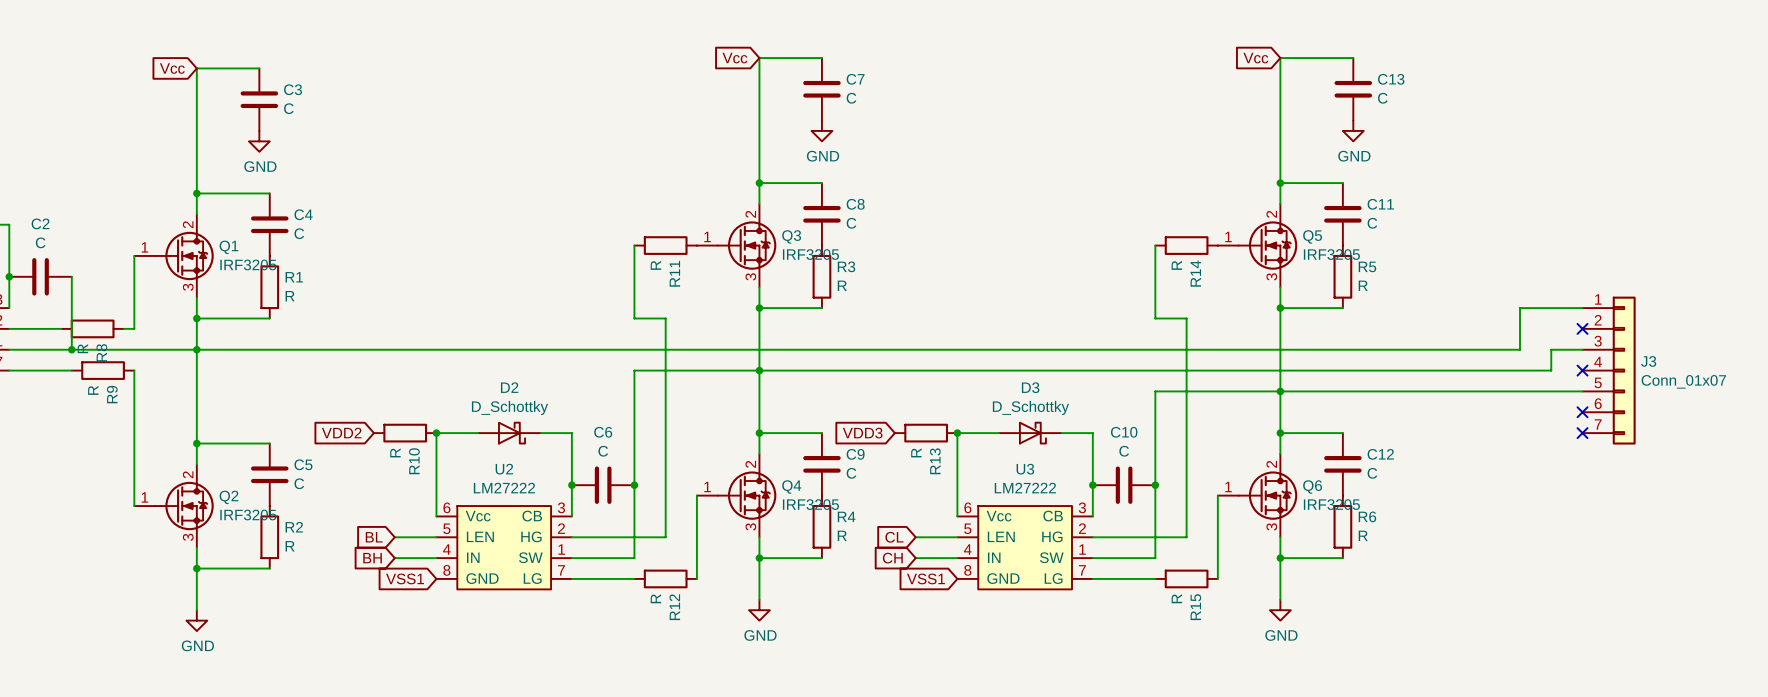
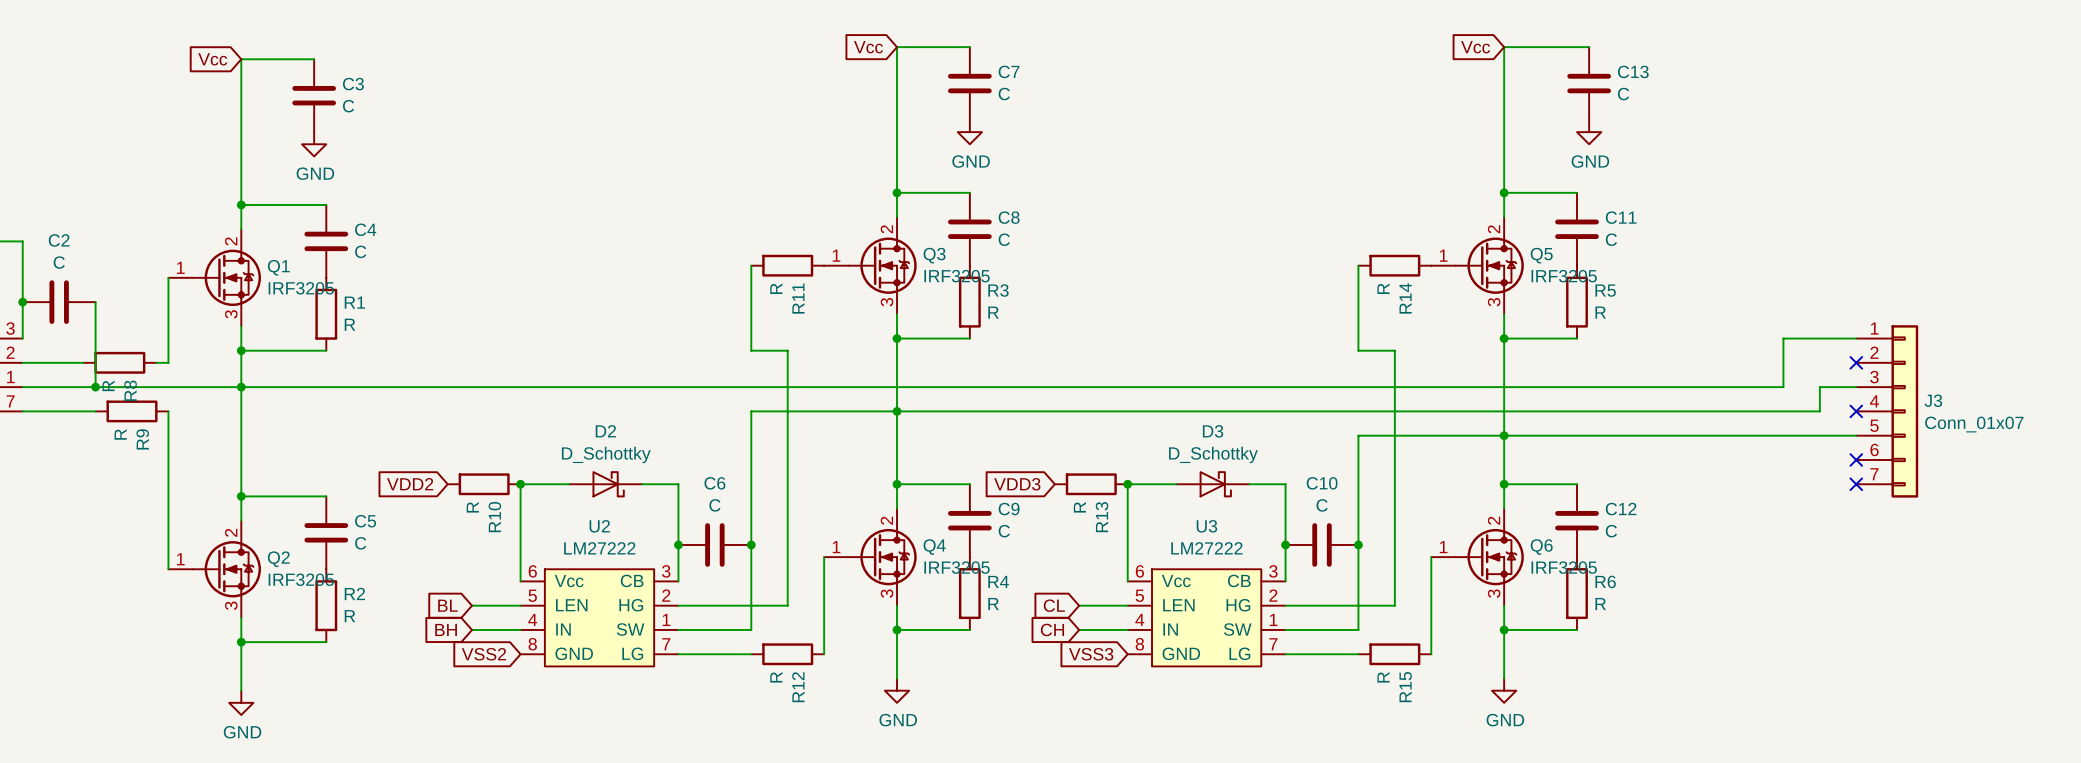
global label: VSS1 (405, 578) -> VSS2 (483, 654)
global label: VSS1 (925, 578) -> VSS3 (1091, 654)

